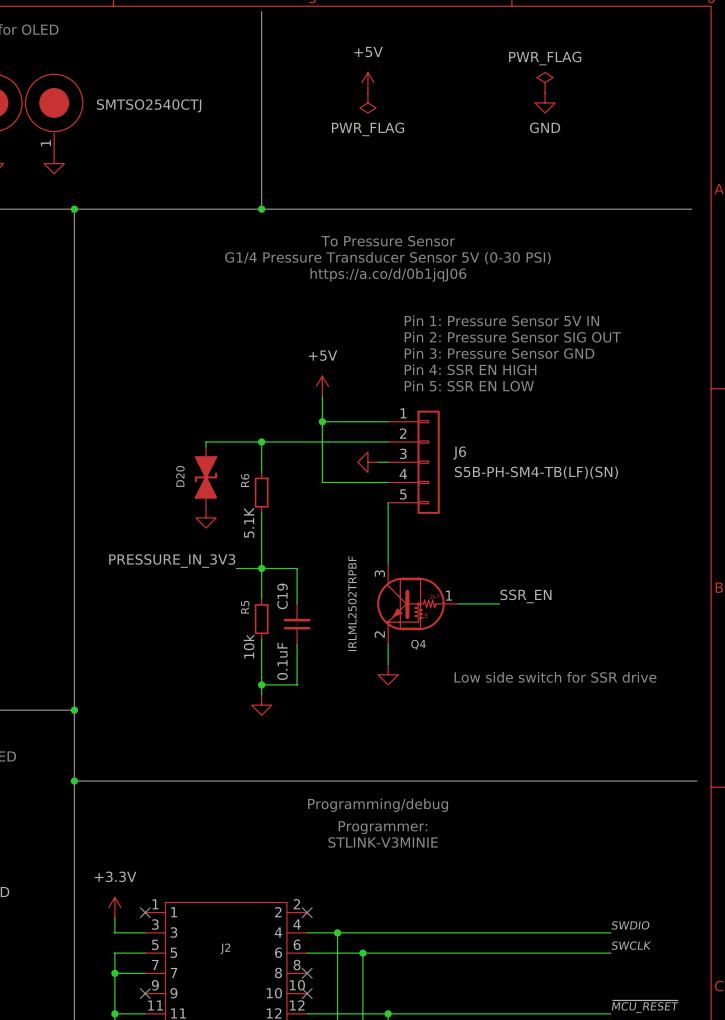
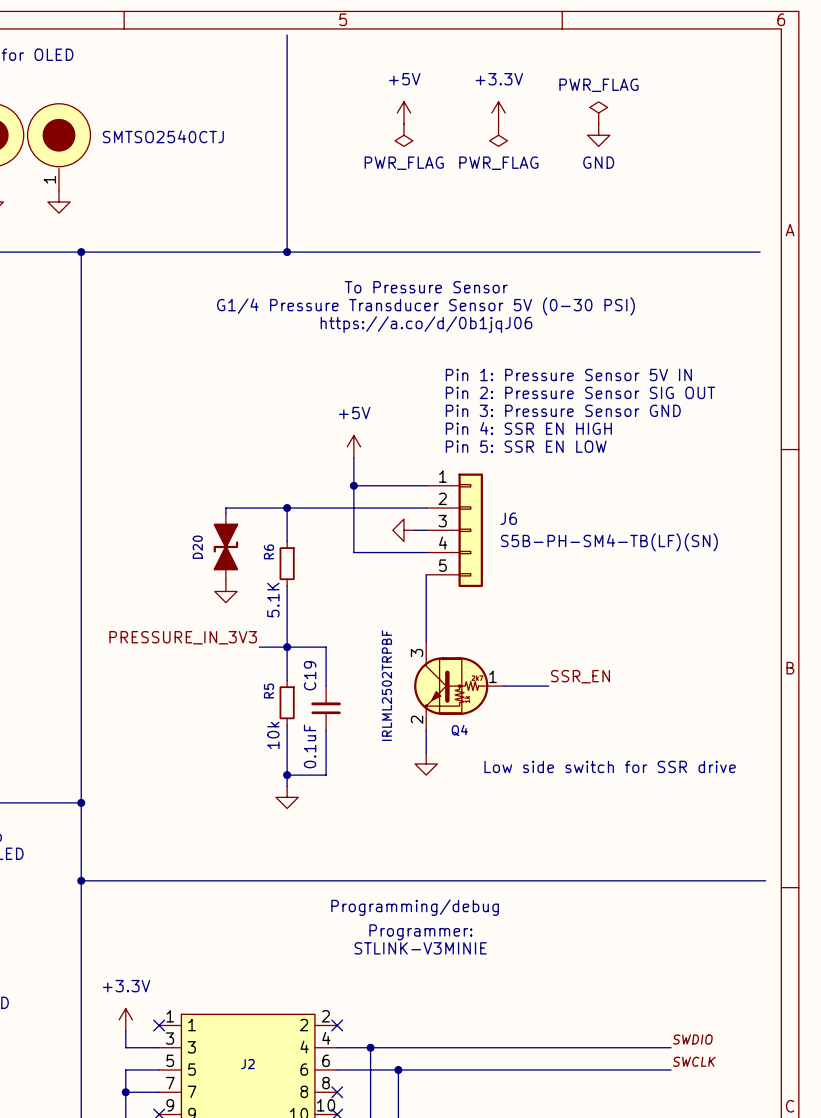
power symbol: none -> +3.3V (498, 112)
power symbol: none -> PWR_FLAG (498, 135)

